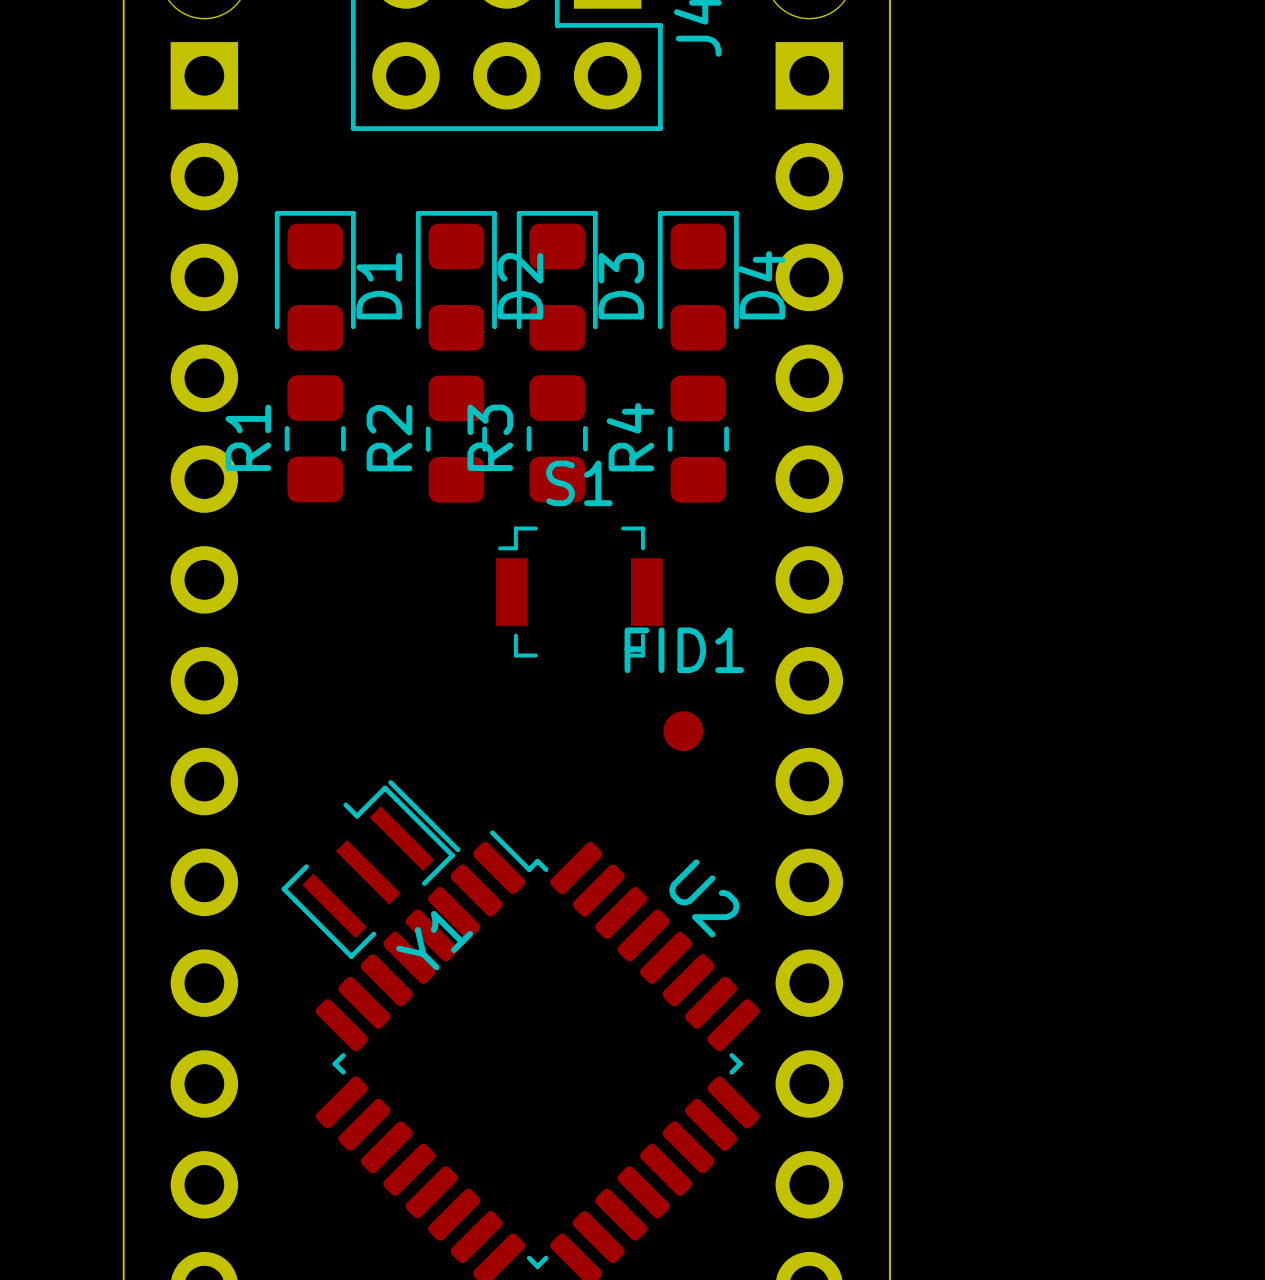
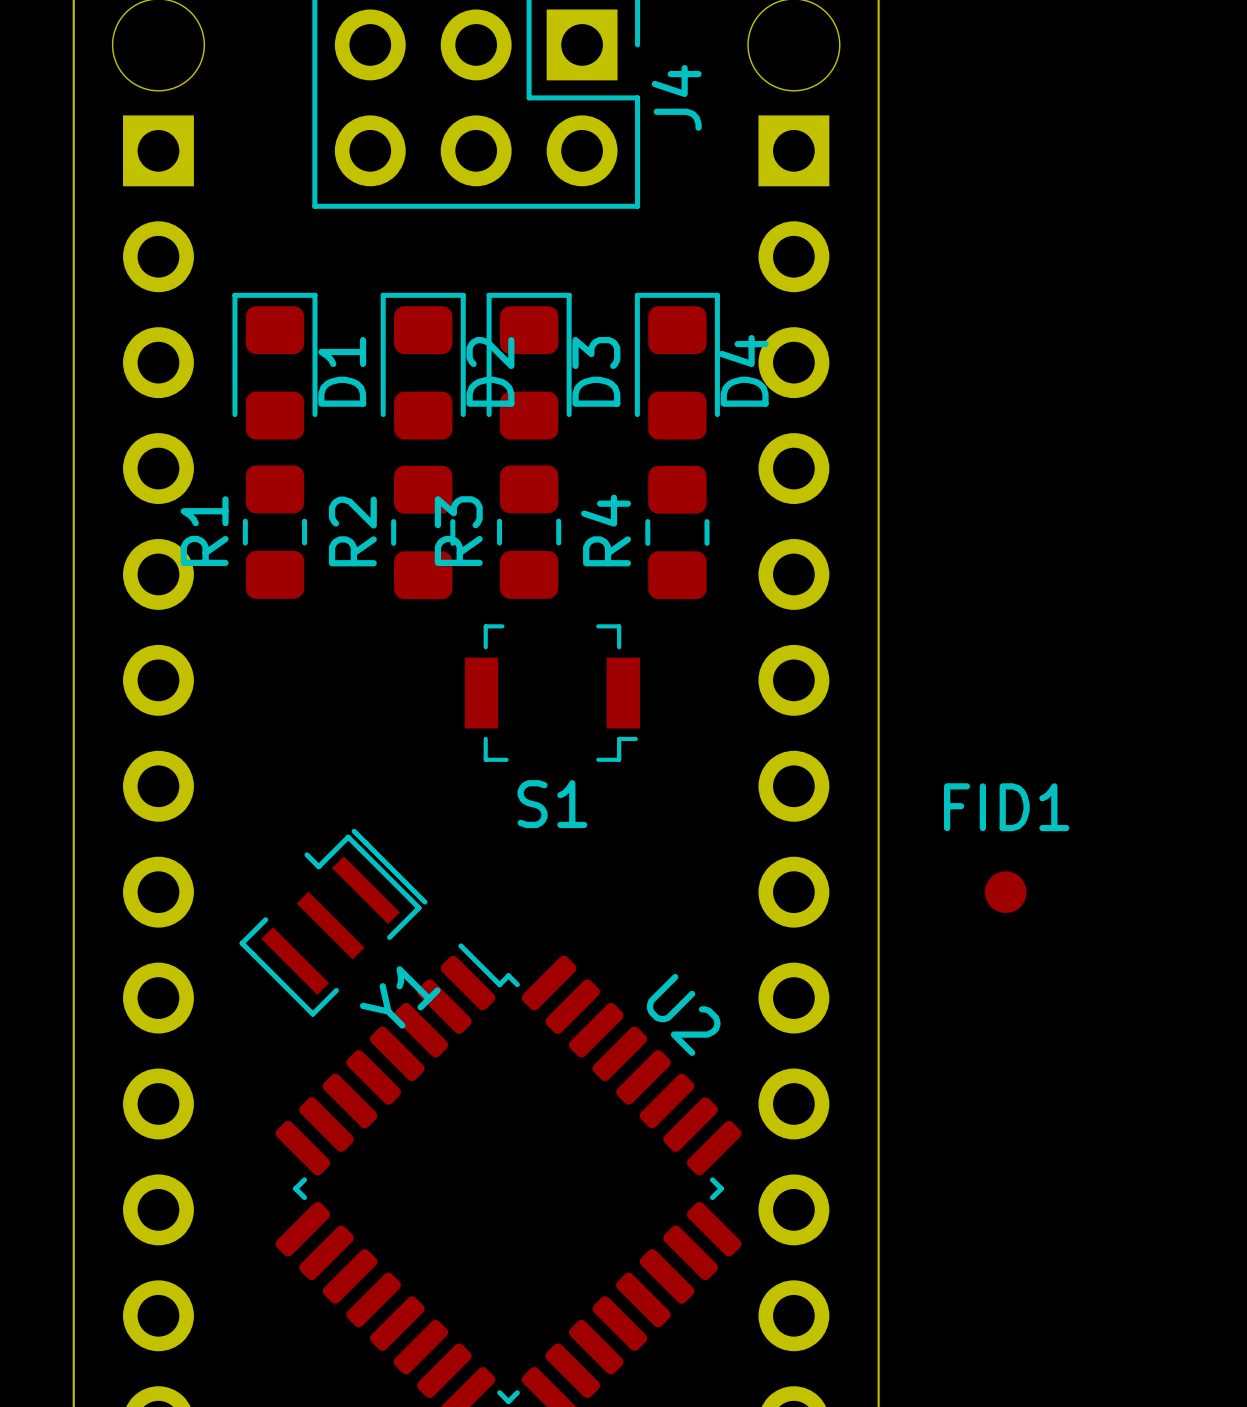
S1 rotation: 0° (579, 592) -> 180° (552, 693)
FID1 position: (683, 731) -> (1005, 892)
Y1 position: (371, 869) -> (333, 922)

